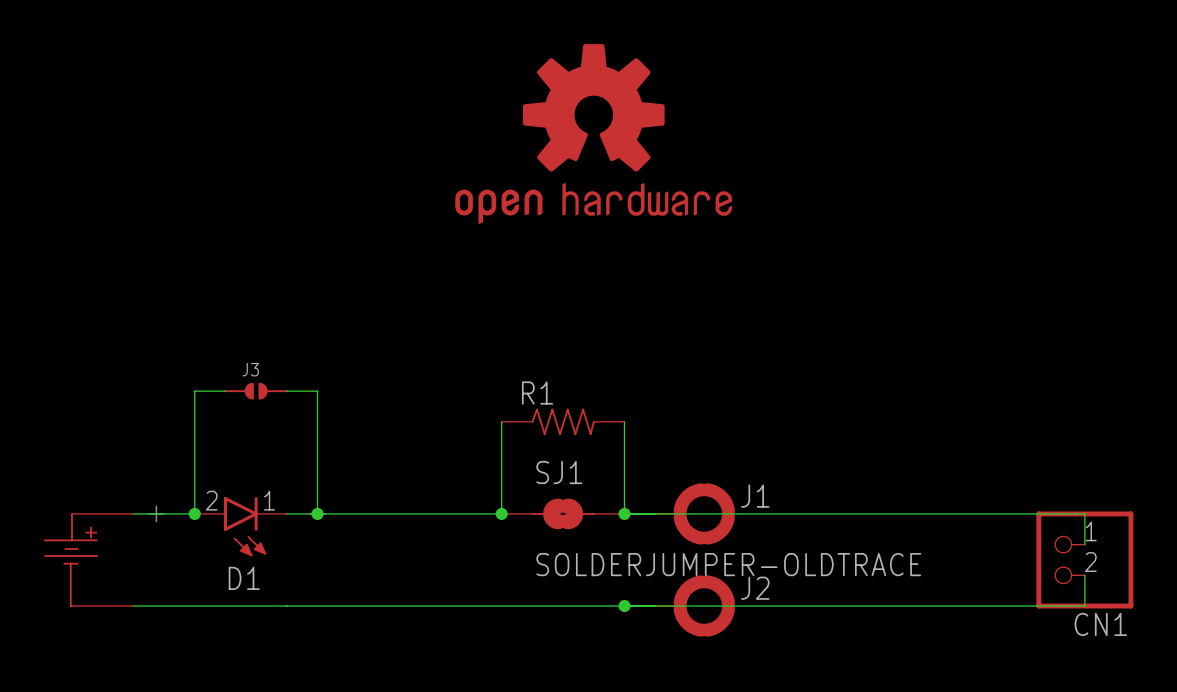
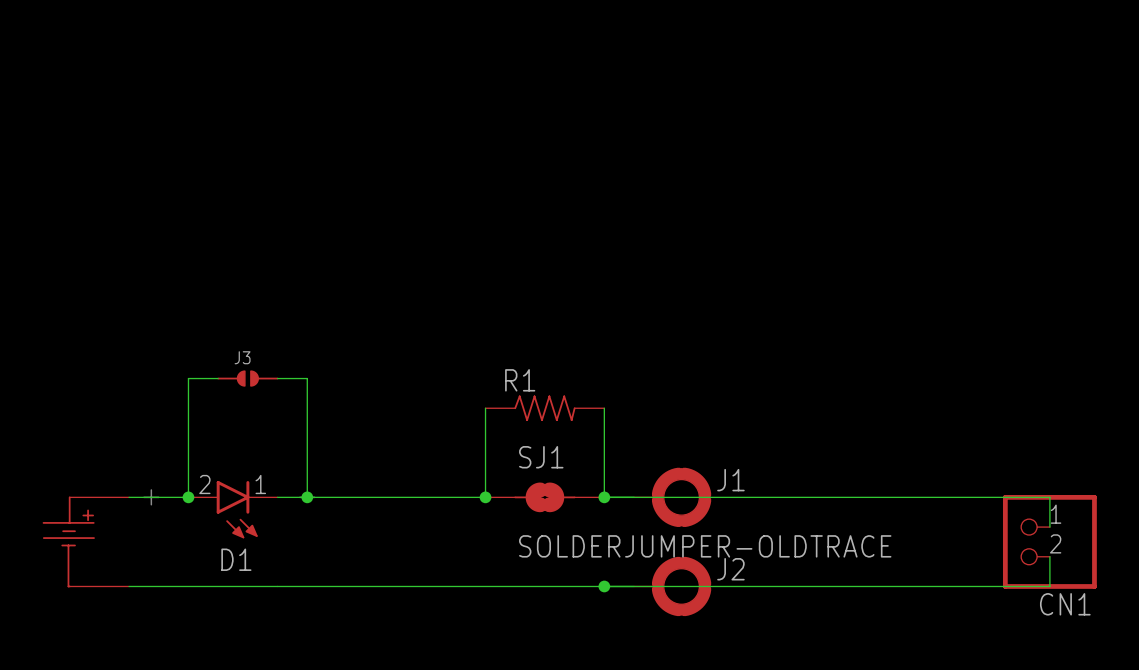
part: (593, 133) -> none

